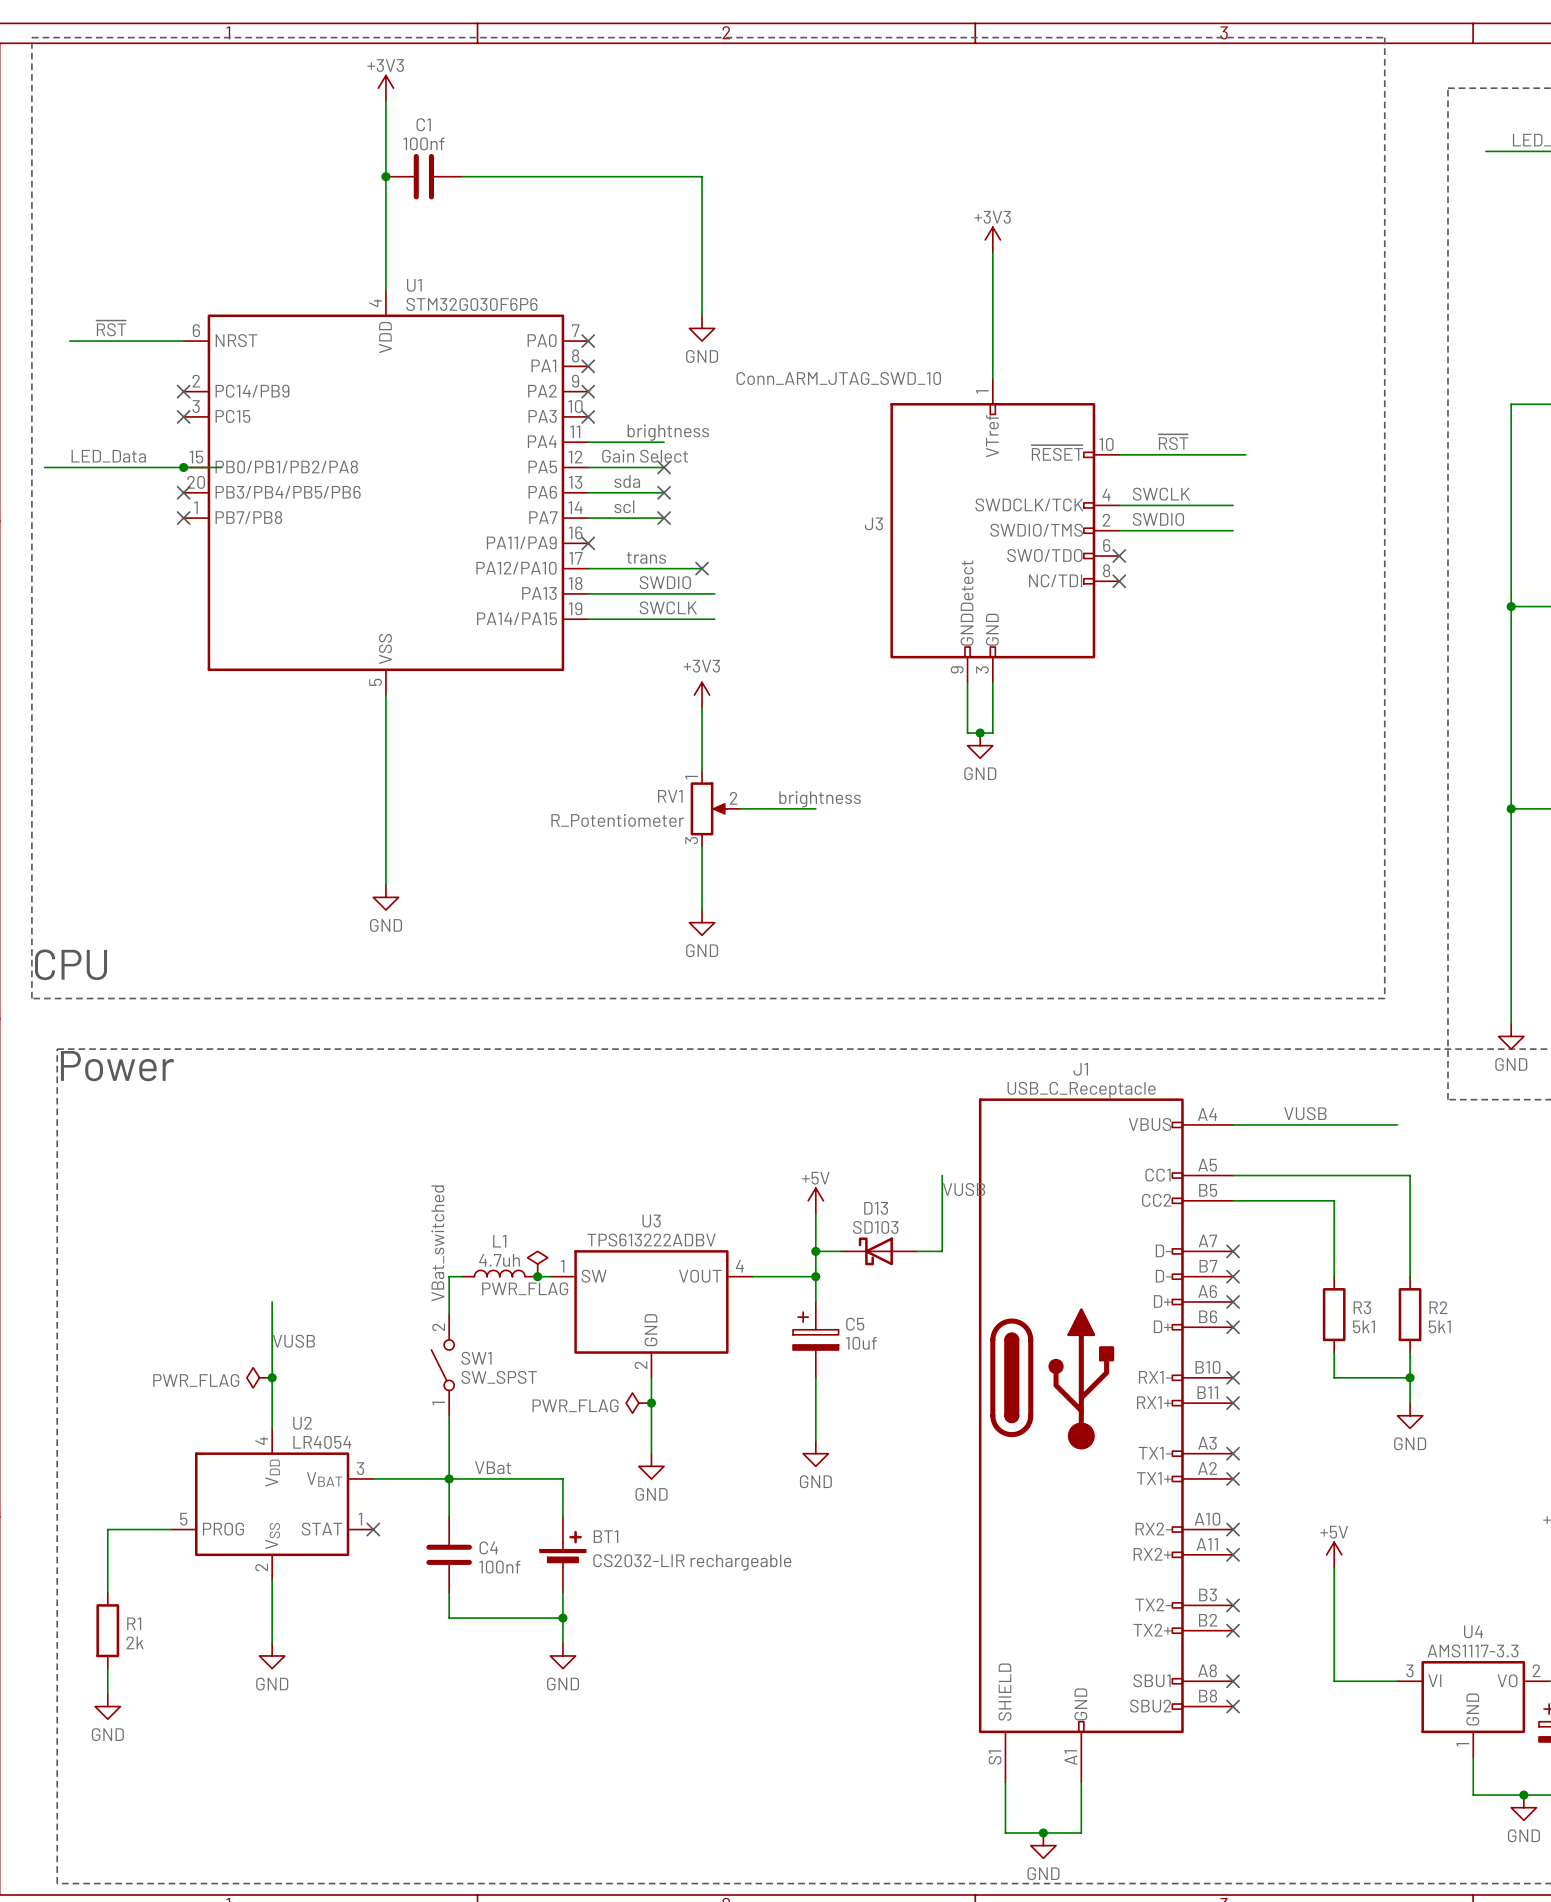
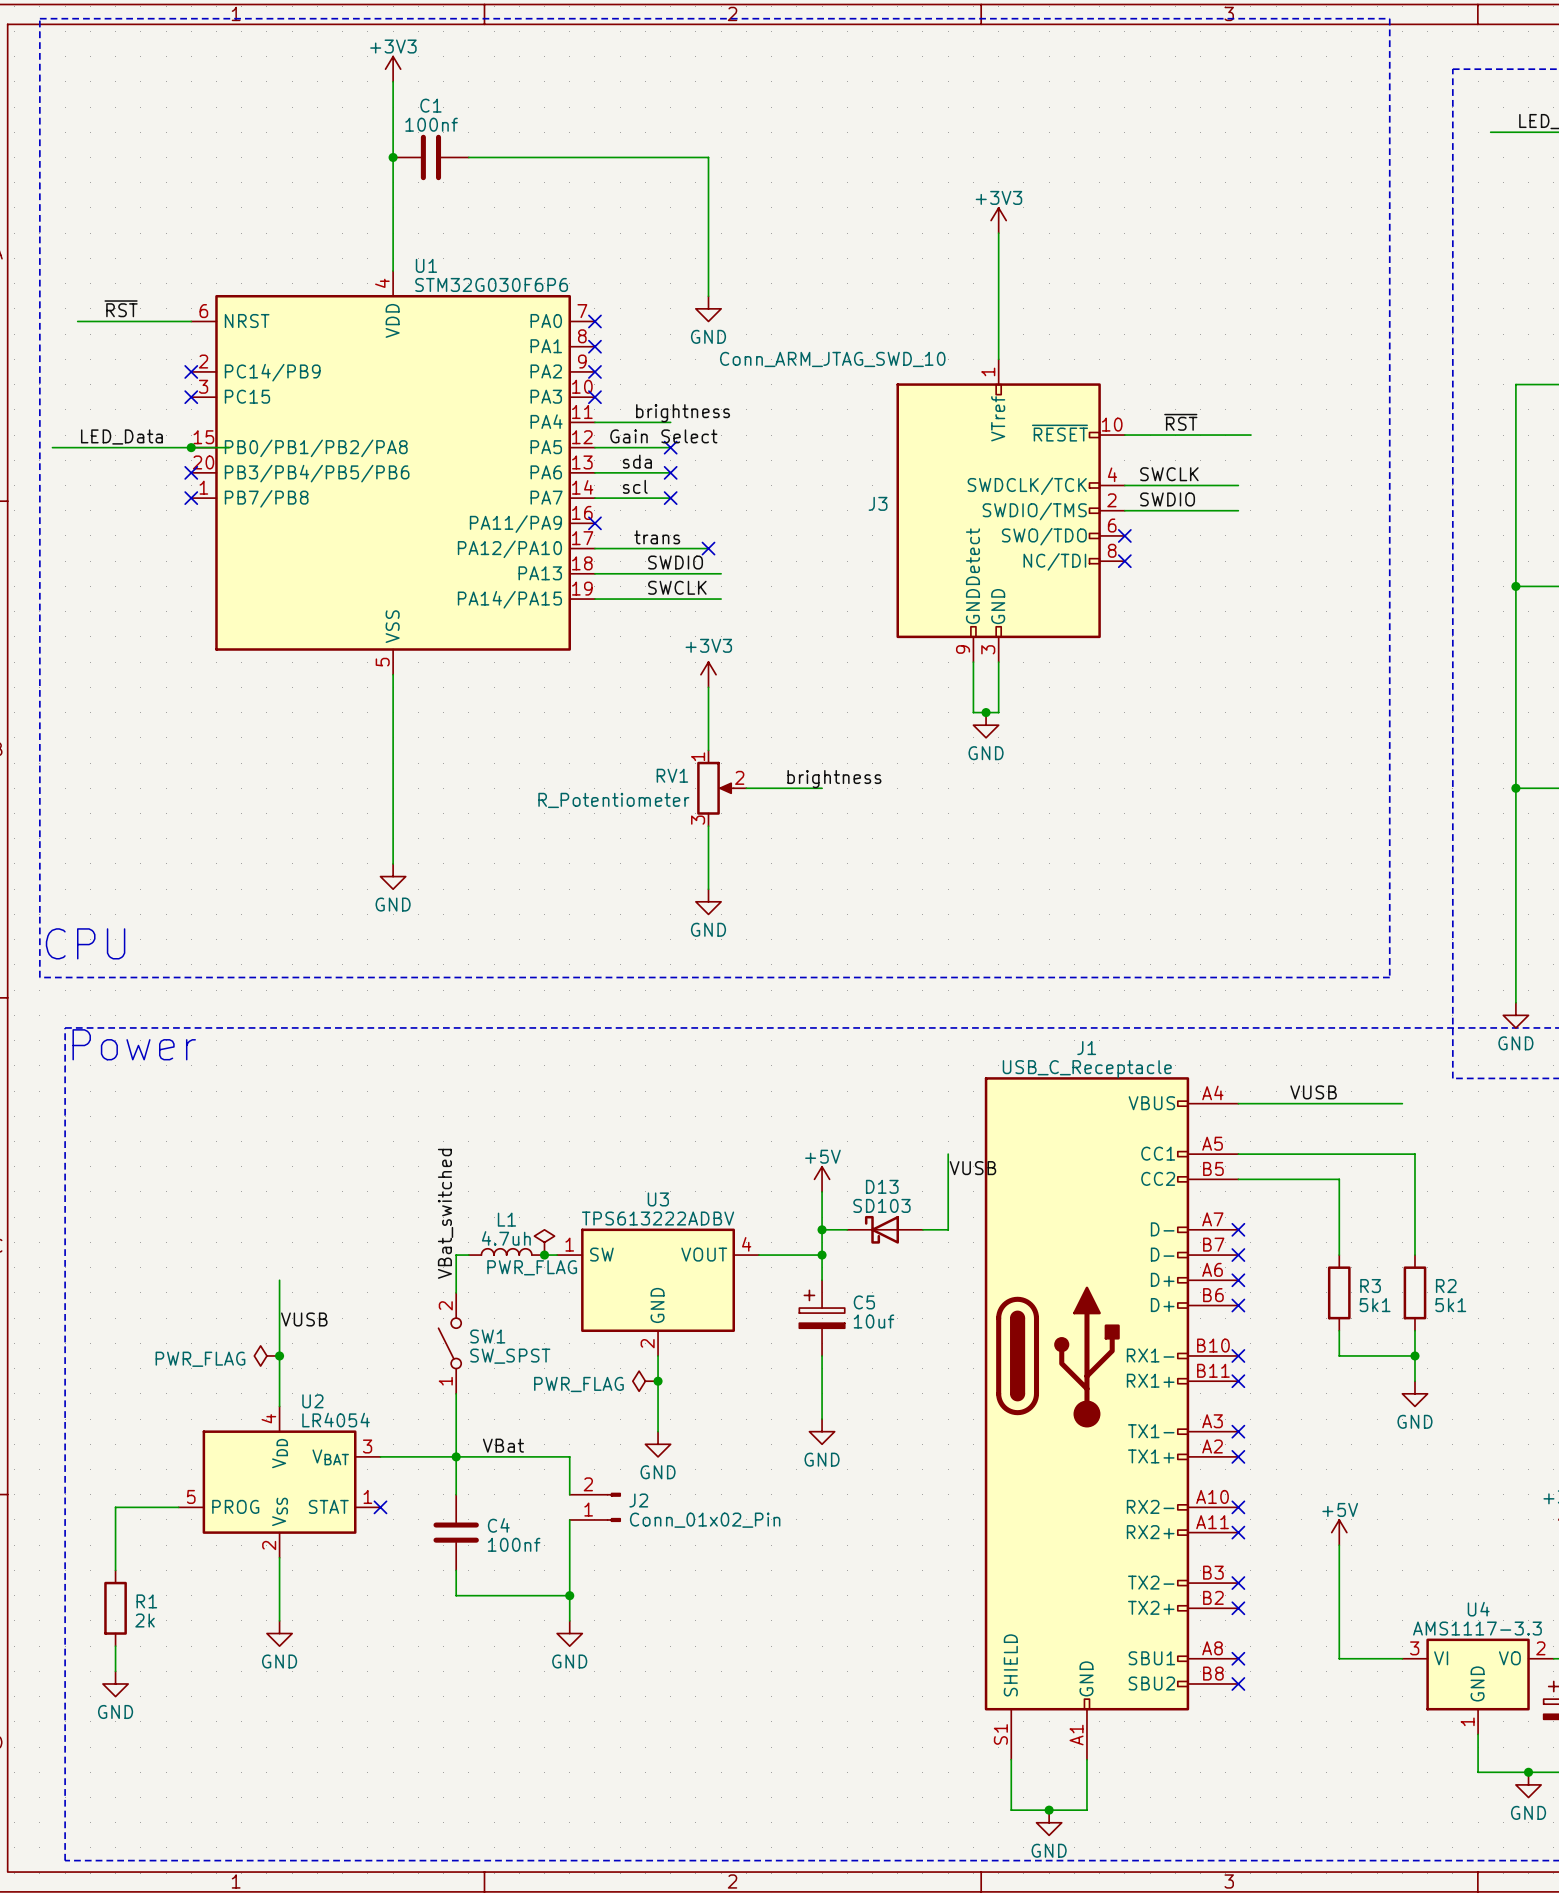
J2: none -> Conn_01x02_Pin (595, 1507)
BT1: CS2032-LIR rechargeable (562, 1554) -> none

